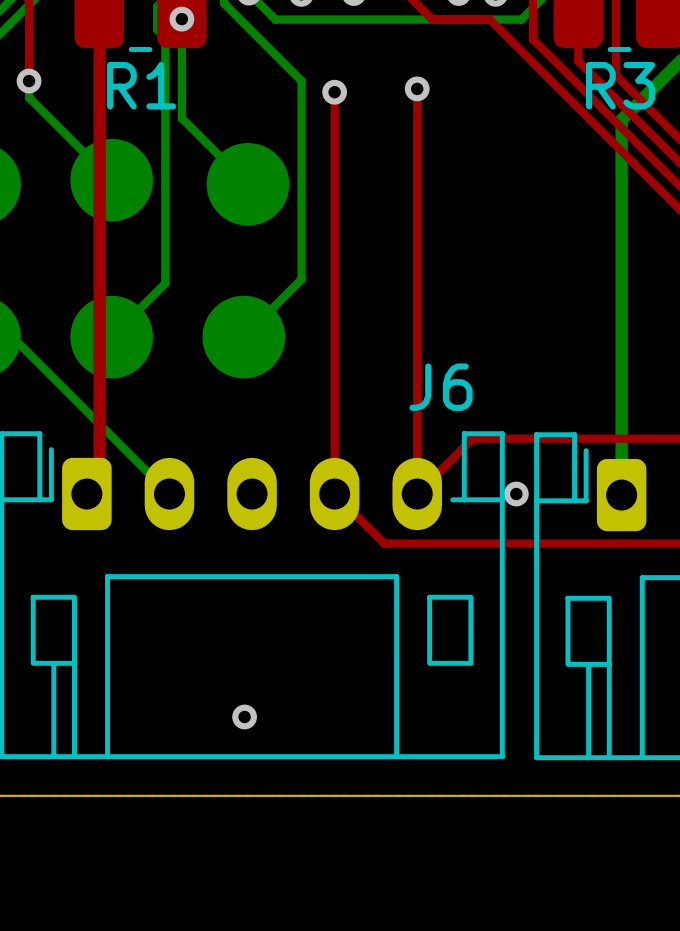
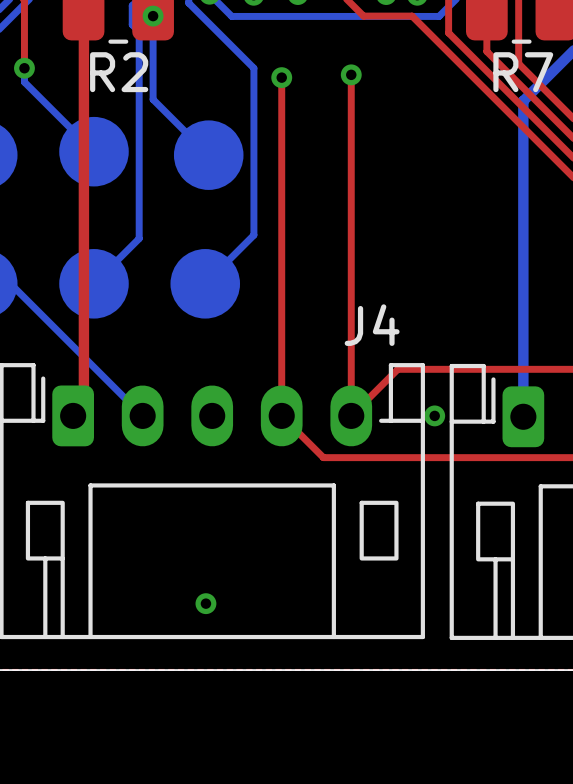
R1 name: R1 (141, 85) -> R2 (119, 72)
R3 name: R3 (620, 85) -> R7 (523, 72)
J6 name: J6 (441, 387) -> J4 (372, 325)

